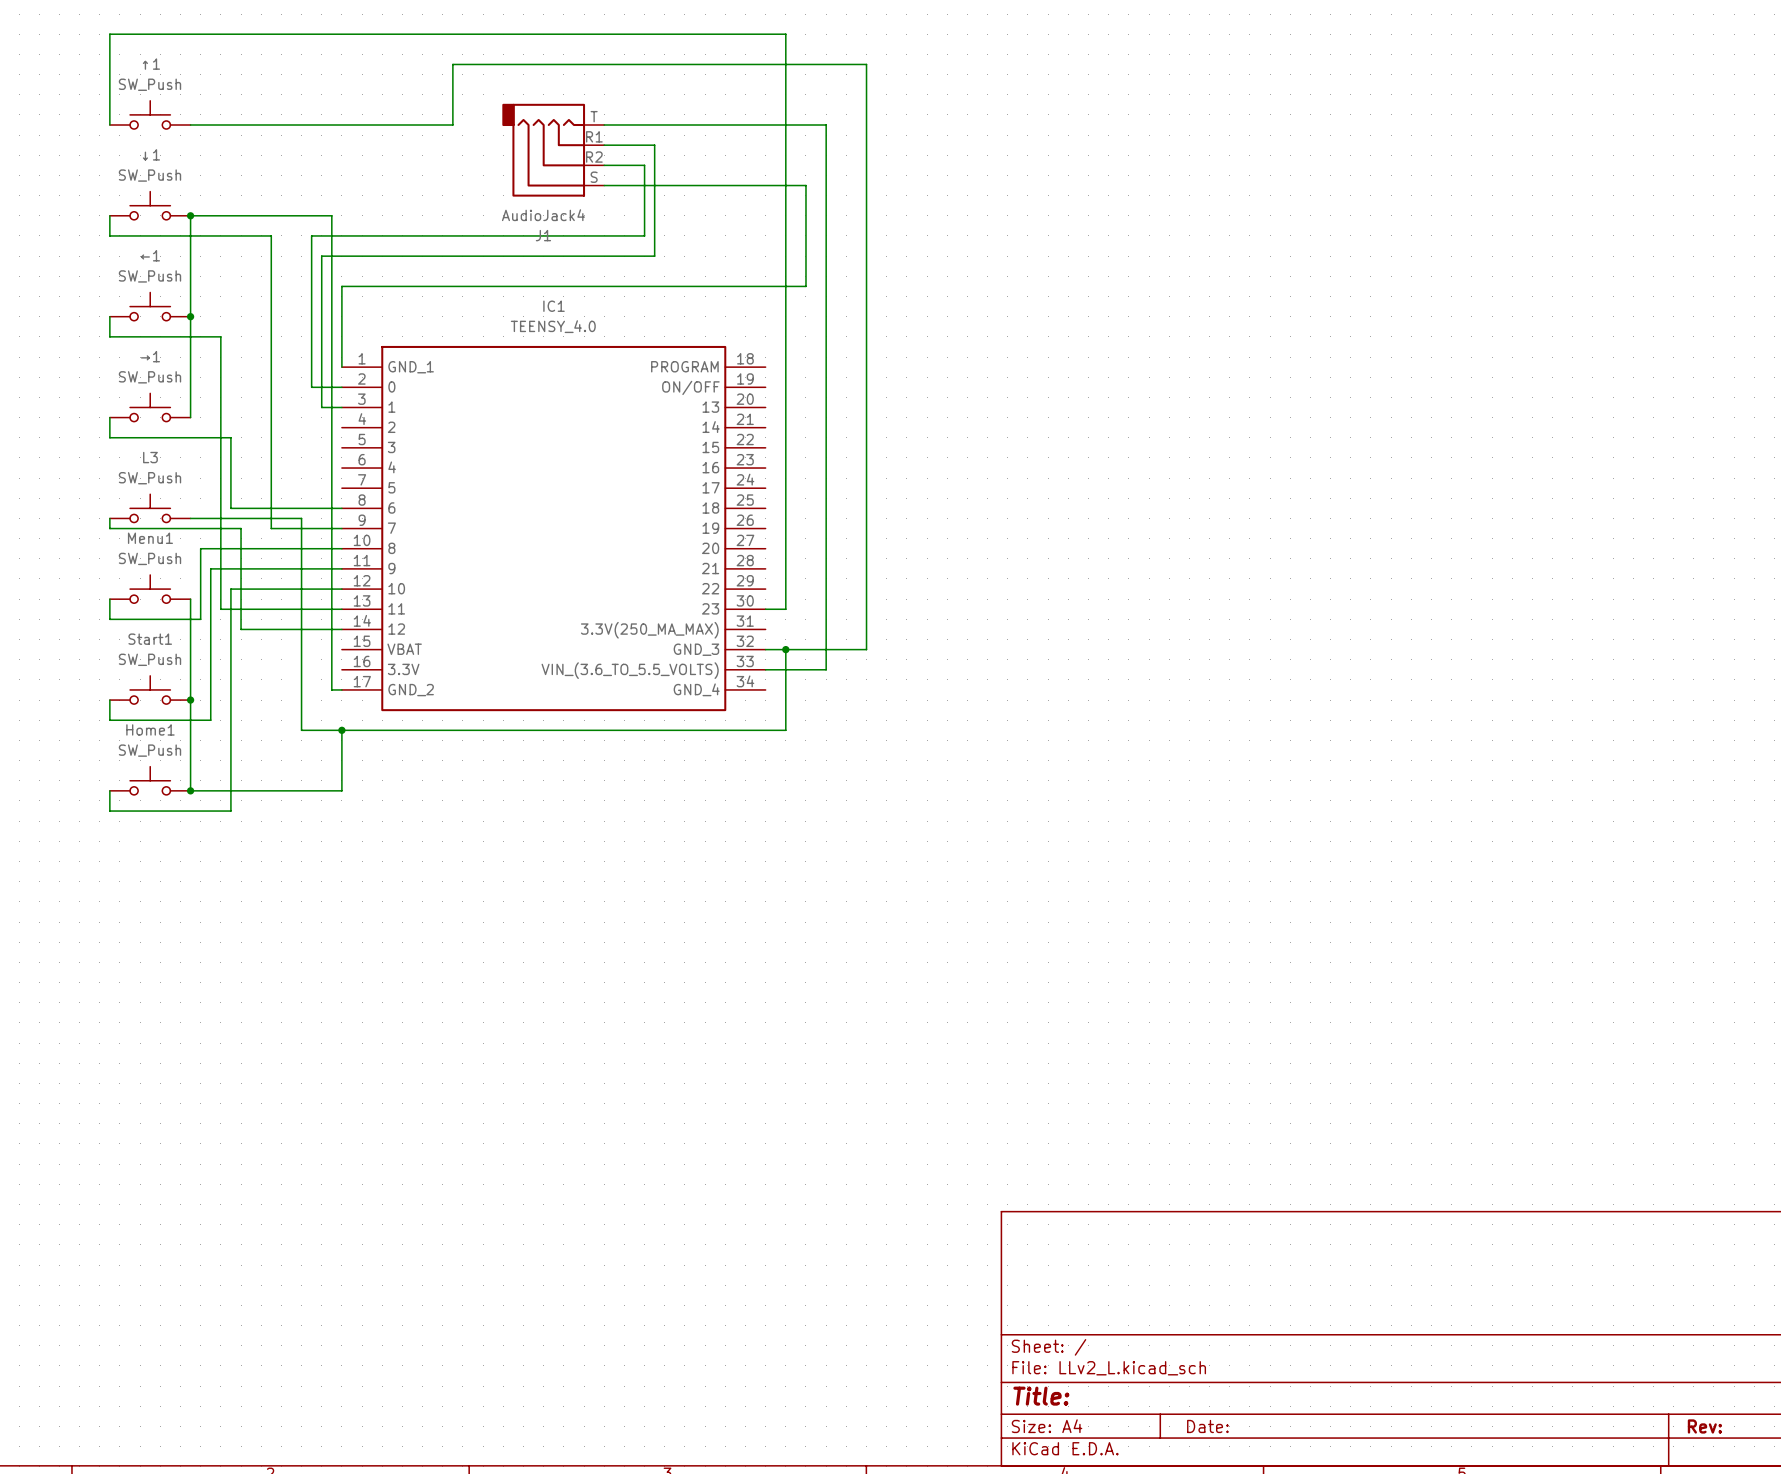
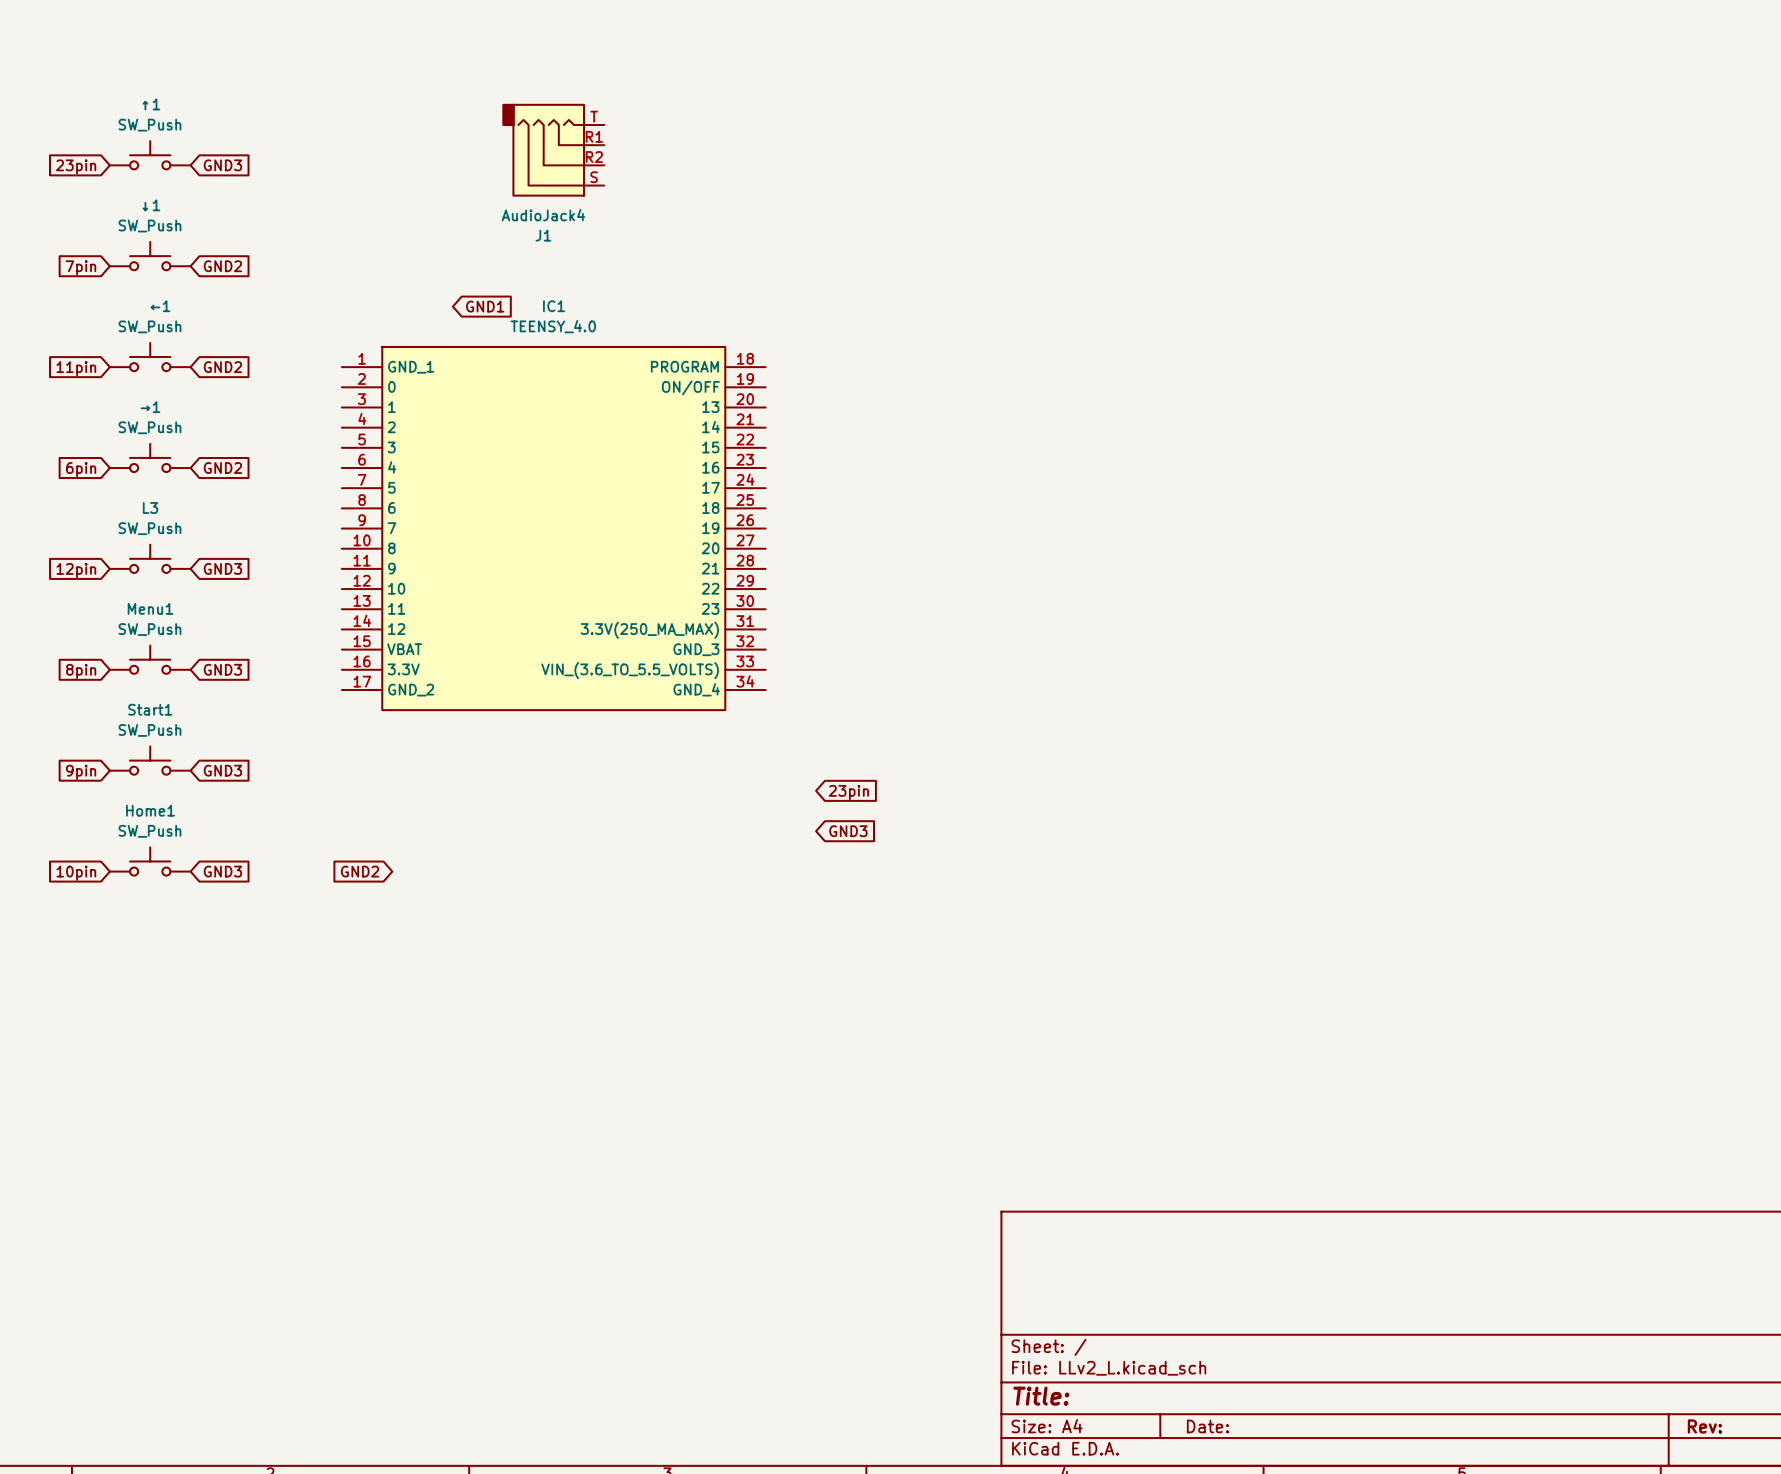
↑1 position: (150, 114) -> (150, 155)
wire: (109, 125) (109, 34) (785, 34) (785, 609) (765, 609) -> none
wire: (190, 125) (452, 125) (452, 64) (866, 64) (866, 649) (765, 649) -> none
wire: (604, 125) (826, 125) (826, 669) (765, 669) -> none
wire: (604, 145) (654, 145) (654, 256) (321, 256) (321, 407) (341, 407) -> none
global label: none -> GND3 (222, 165)
wire: (604, 165) (644, 165) (644, 235) (311, 235) (311, 387) (341, 387) -> none
global label: none -> 23pin (76, 167)
wire: (604, 185) (805, 185) (805, 286) (341, 286) (341, 367) -> none
↓1 position: (150, 205) -> (150, 256)
wire: (109, 215) (109, 235) (271, 235) (271, 528) (341, 528) -> none
junction: (190, 215) -> none
←1 name position: ←1 (150, 255) -> ←1 (160, 306)
global label: none -> GND2 (222, 266)
global label: none -> 7pin (80, 267)
←1 position: (150, 306) -> (150, 357)
global label: none -> GND1 (485, 306)
wire: (109, 316) (109, 336) (220, 336) (220, 609) (341, 609) -> none
junction: (190, 316) -> none
global label: none -> GND2 (222, 367)
global label: none -> 11pin (76, 368)
→1 position: (150, 407) -> (150, 457)
wire: (109, 417) (109, 437) (230, 437) (230, 508) (341, 508) -> none
wire: (190, 417) (190, 215) (331, 215) (331, 689) (341, 689) -> none
global label: none -> GND2 (222, 468)
global label: none -> 6pin (81, 469)
L3 position: (150, 508) -> (150, 558)
wire: (109, 518) (109, 528) (241, 528) (241, 629) (341, 629) -> none
wire: (190, 518) (301, 518) (301, 730) (785, 730) (785, 649) -> none
wire: (341, 548) (200, 548) (200, 619) (109, 619) (109, 599) -> none
global label: none -> GND3 (222, 568)
wire: (341, 568) (210, 568) (210, 720) (109, 720) (109, 700) -> none
global label: none -> 12pin (76, 570)
Menu1 position: (150, 589) -> (150, 659)
wire: (341, 589) (230, 589) (230, 811) (109, 811) (109, 790) -> none
wire: (190, 599) (190, 790) (341, 790) (341, 730) -> none
junction: (785, 649) -> none
global label: none -> GND3 (222, 669)
global label: none -> 8pin (81, 671)
Start1 position: (150, 689) -> (150, 760)
junction: (190, 700) -> none
junction: (341, 730) -> none
global label: none -> GND3 (222, 770)
global label: none -> 9pin (81, 772)
Home1 position: (150, 780) -> (150, 861)
junction: (190, 790) -> none
global label: none -> 23pin (848, 792)
global label: none -> GND3 (848, 831)
global label: none -> GND3 (222, 871)
global label: none -> GND2 (360, 871)
global label: none -> 10pin (76, 873)

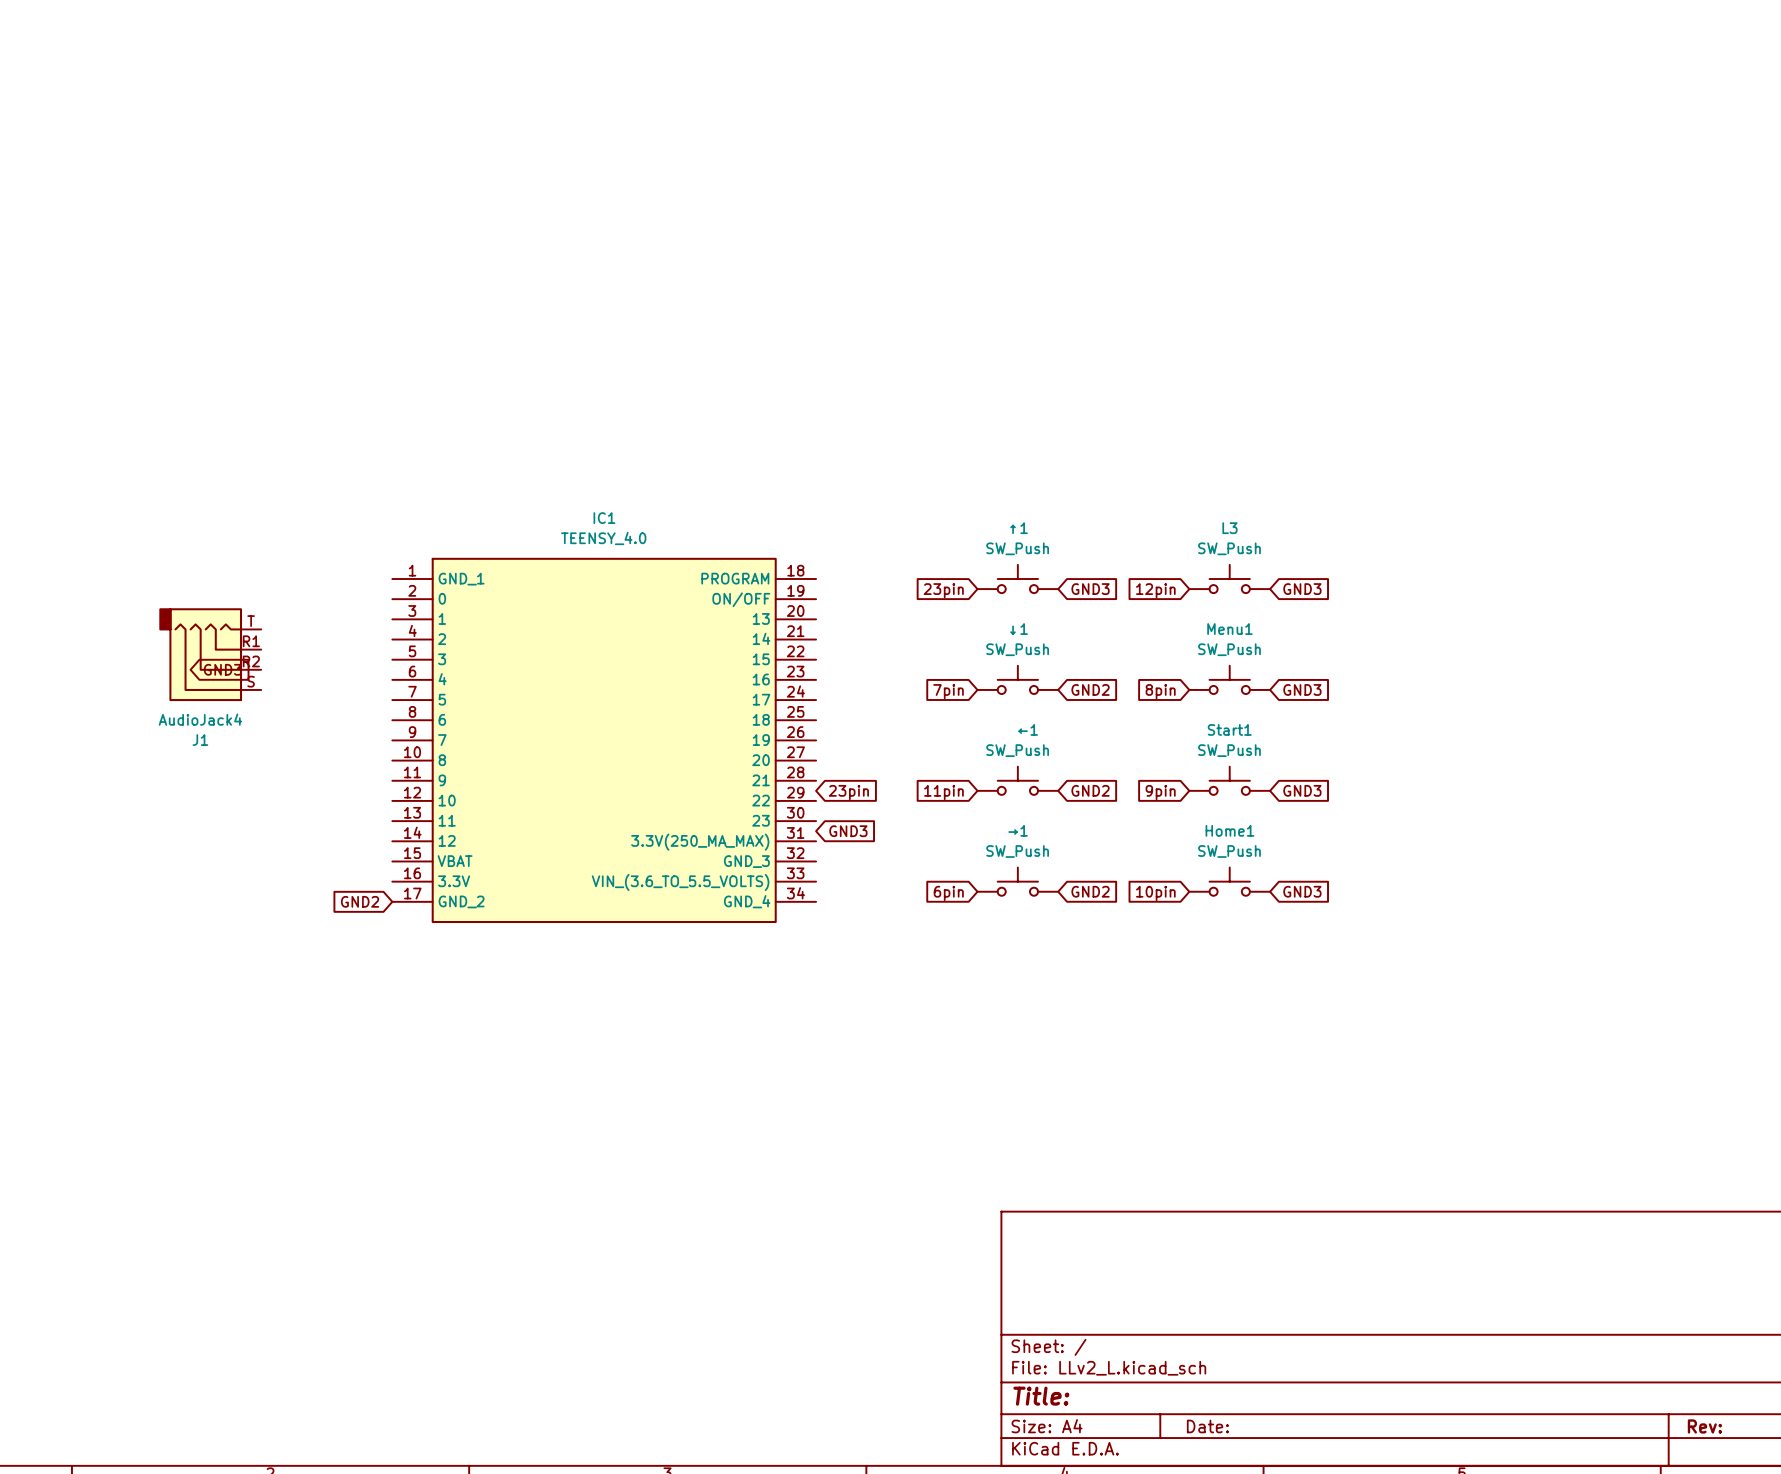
J1 position: (553, 150) -> (210, 654)
↑1 position: (150, 155) -> (1017, 578)
global label: GND3 (222, 165) -> none
global label: 23pin (76, 167) -> none
↓1 position: (150, 256) -> (1017, 679)
global label: GND2 (222, 266) -> none
global label: 7pin (80, 267) -> none
global label: GND1 (485, 306) -> none
←1 position: (150, 357) -> (1017, 780)
global label: GND2 (222, 367) -> none
global label: 11pin (76, 368) -> none
→1 position: (150, 457) -> (1017, 881)
global label: GND2 (222, 468) -> none
global label: 6pin (81, 469) -> none
IC1 position: (553, 528) -> (604, 740)
L3 position: (150, 558) -> (1229, 578)
global label: GND3 (222, 568) -> none
global label: 12pin (76, 570) -> none
global label: none -> GND3 (1090, 589)
global label: none -> GND3 (1302, 589)
global label: none -> 23pin (943, 590)
global label: none -> 12pin (1155, 590)
Menu1 position: (150, 659) -> (1229, 679)
global label: 8pin (81, 671) -> none
global label: none -> GND2 (1090, 689)
global label: none -> GND3 (1302, 689)
global label: none -> 7pin (948, 691)
global label: none -> 8pin (1160, 691)
Start1 position: (150, 760) -> (1229, 780)
global label: GND3 (222, 770) -> none
global label: 9pin (81, 772) -> none
global label: none -> GND2 (1090, 790)
global label: none -> GND3 (1302, 790)
global label: none -> 11pin (943, 792)
global label: none -> 9pin (1160, 792)
Home1 position: (150, 861) -> (1229, 881)
global label: GND3 (222, 871) -> none
global label position: GND2 (360, 871) -> GND2 (360, 901)
global label: 10pin (76, 873) -> none
global label: none -> GND2 (1090, 891)
global label: none -> GND3 (1302, 891)
global label: none -> 6pin (948, 893)
global label: none -> 10pin (1155, 893)

